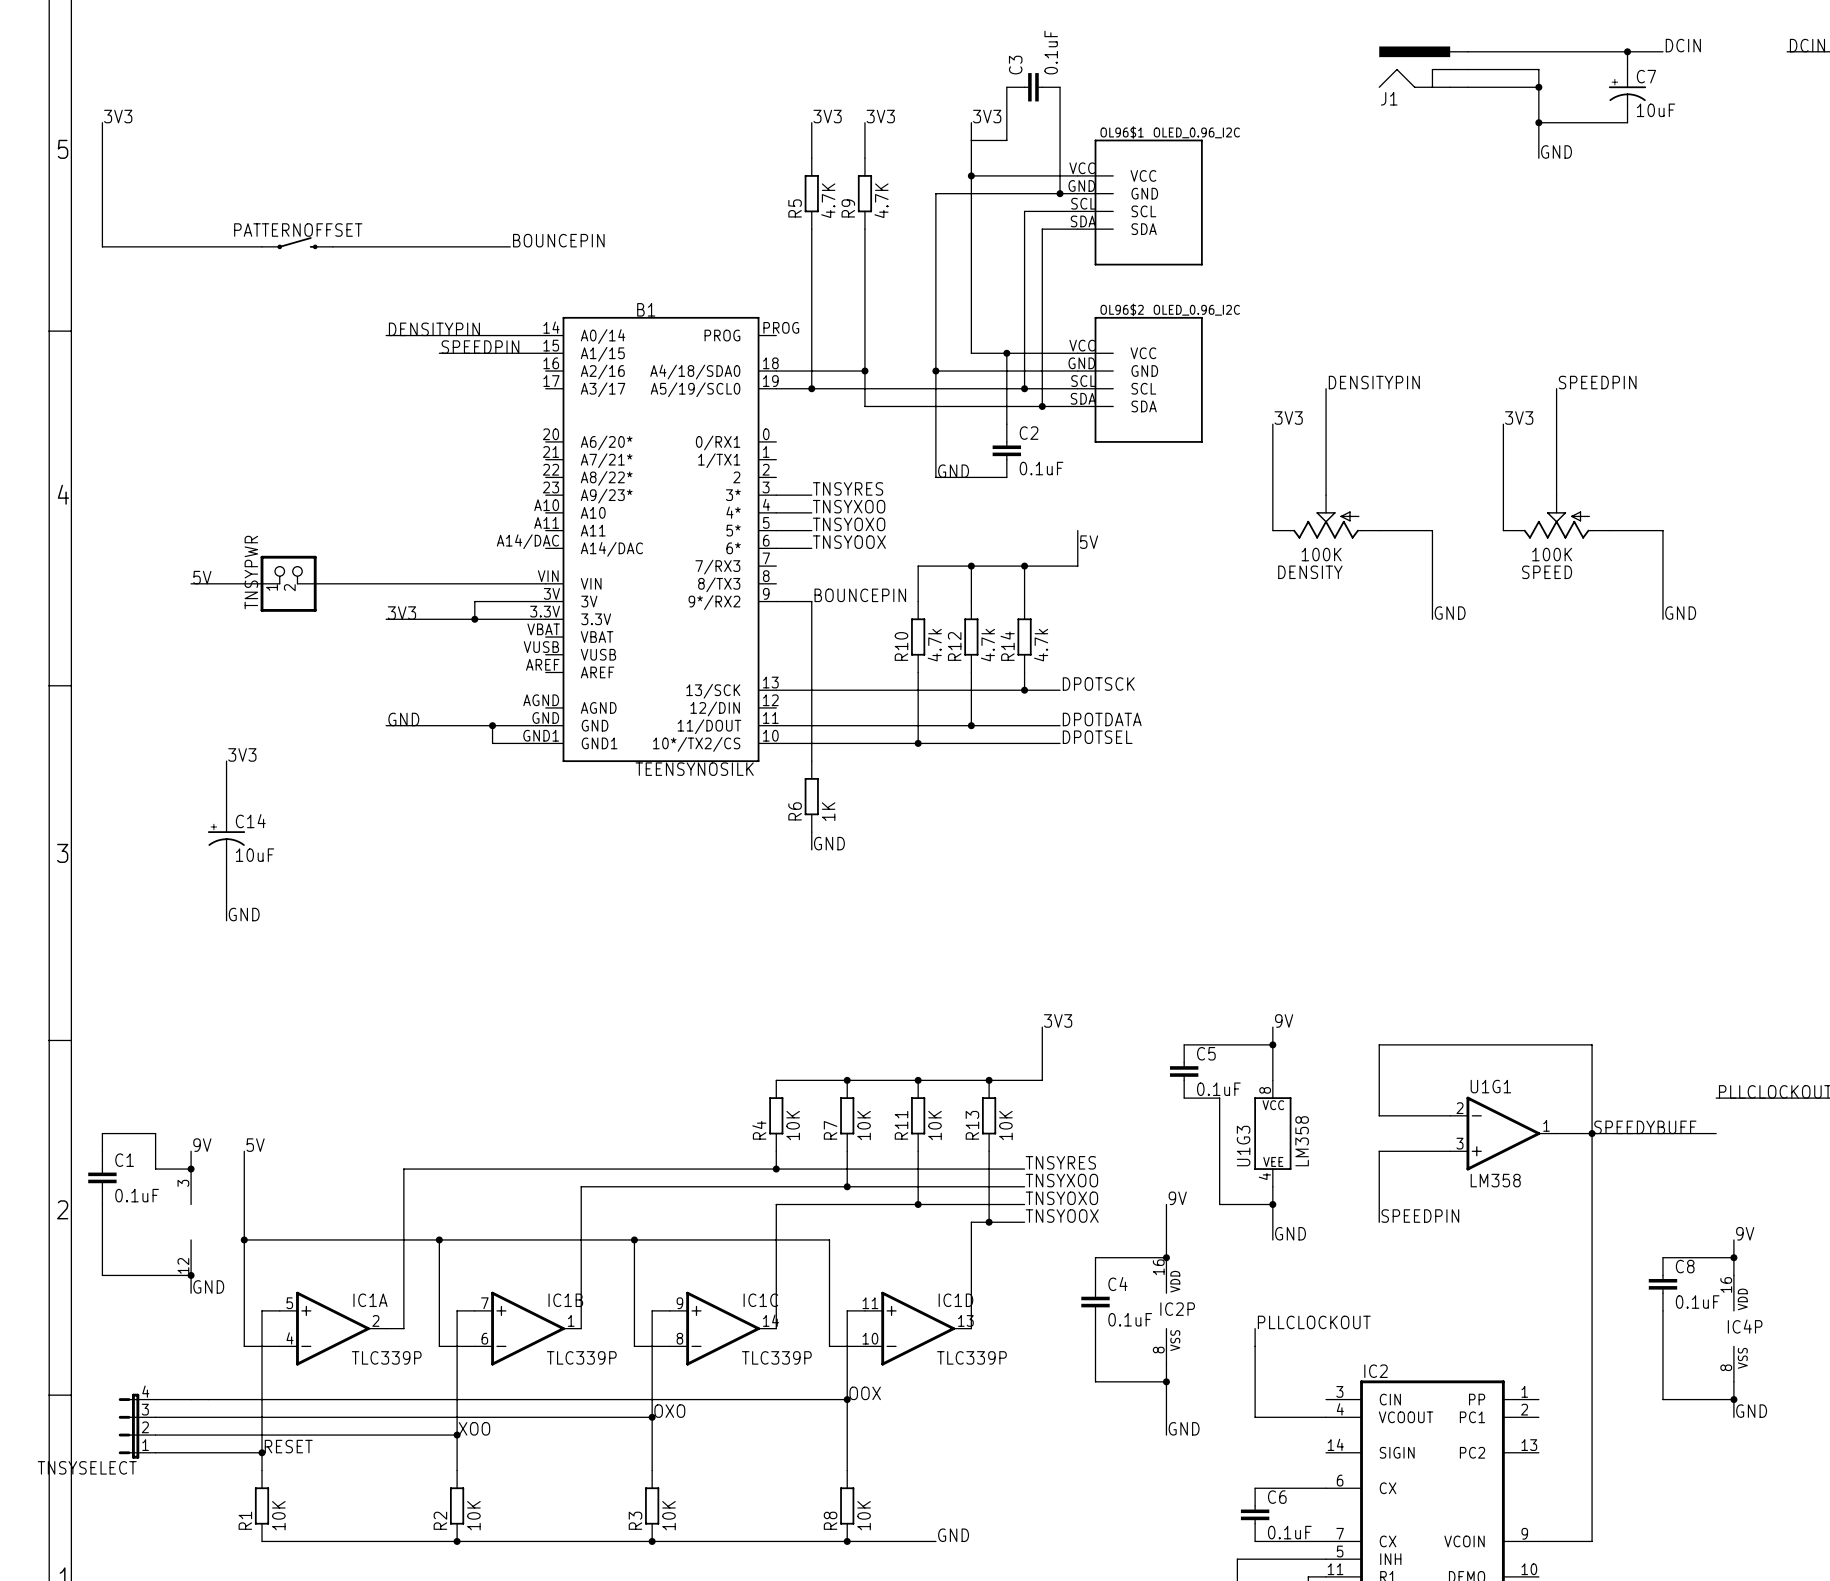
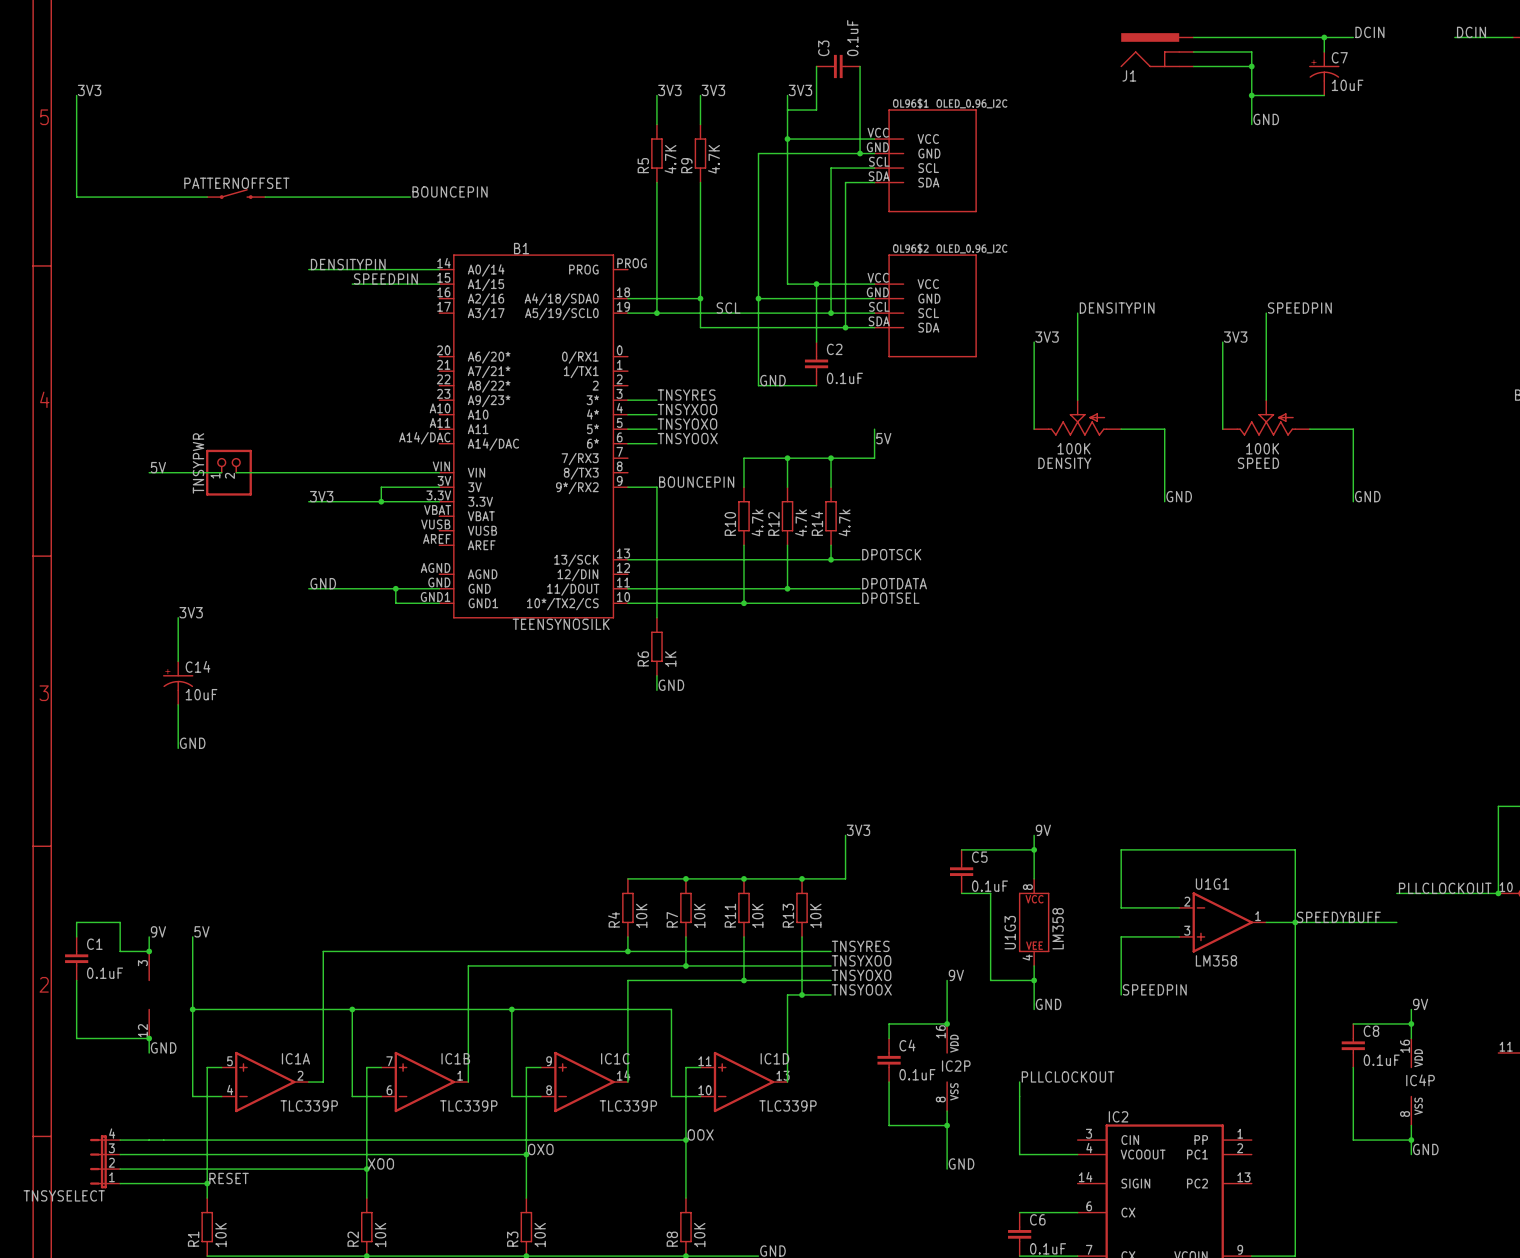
label: none -> SCL (728, 308)

